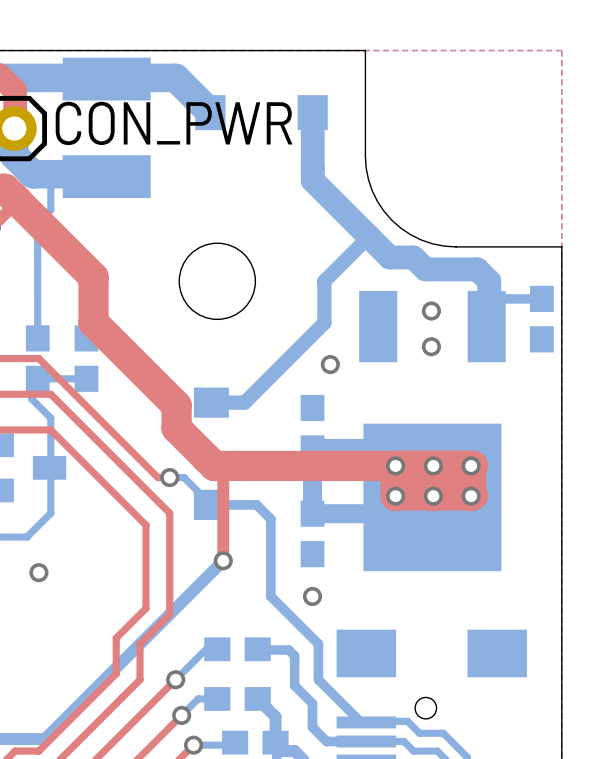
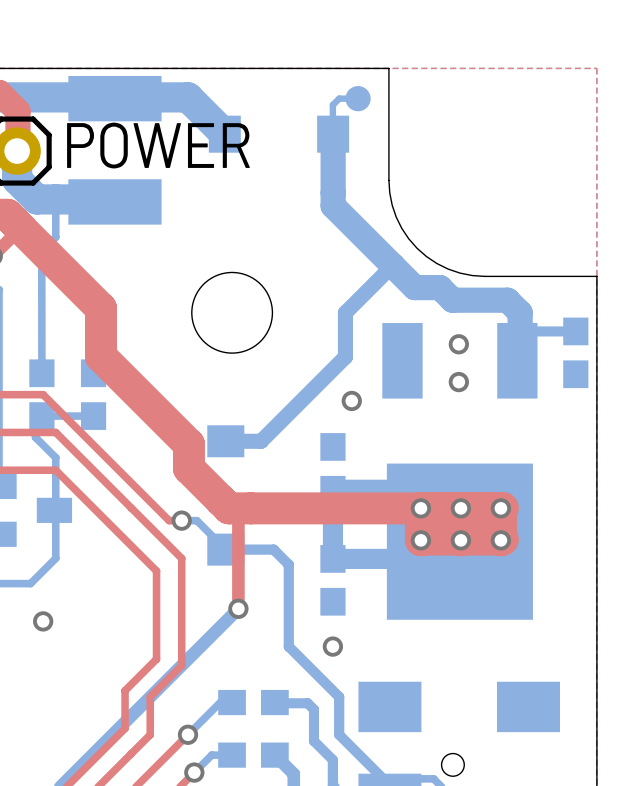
bottom track: none -> (358, 98) (339, 98) (332, 104) (332, 133)
part: none -> (358, 98)
text: none -> POWER (158, 145)
CON_PWR name: CON_PWR (173, 123) -> none

